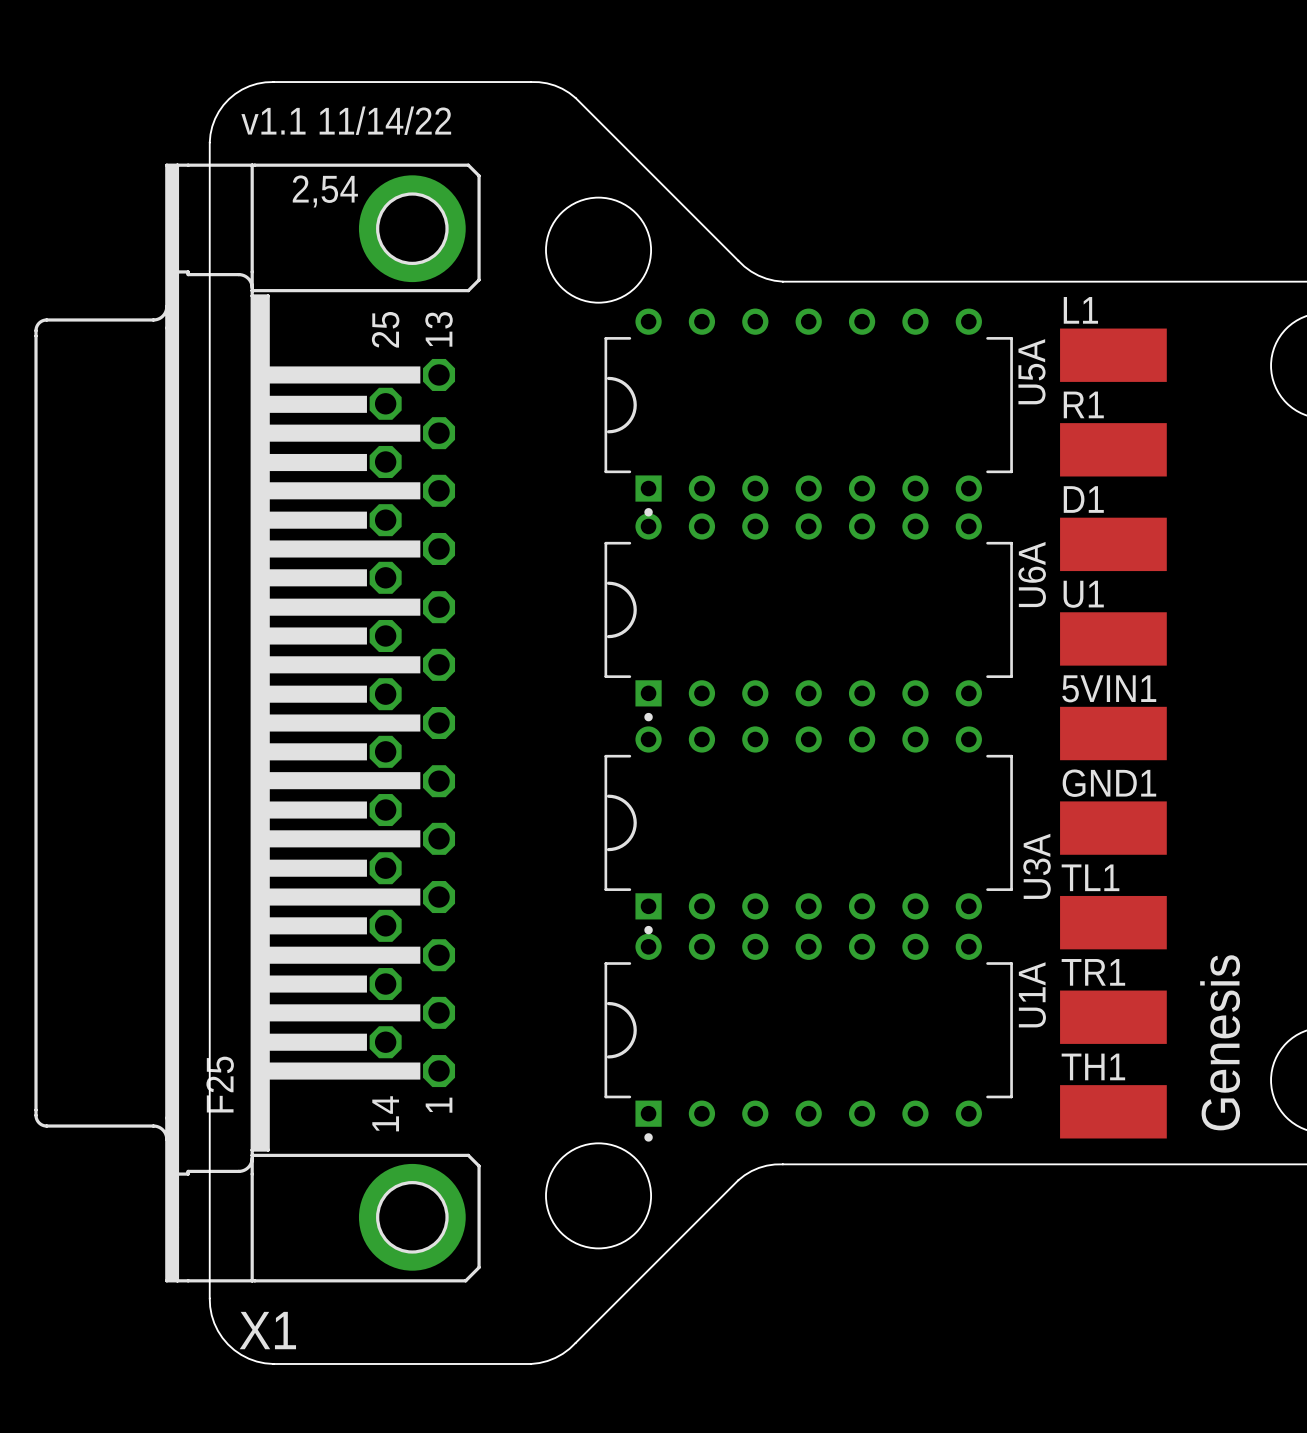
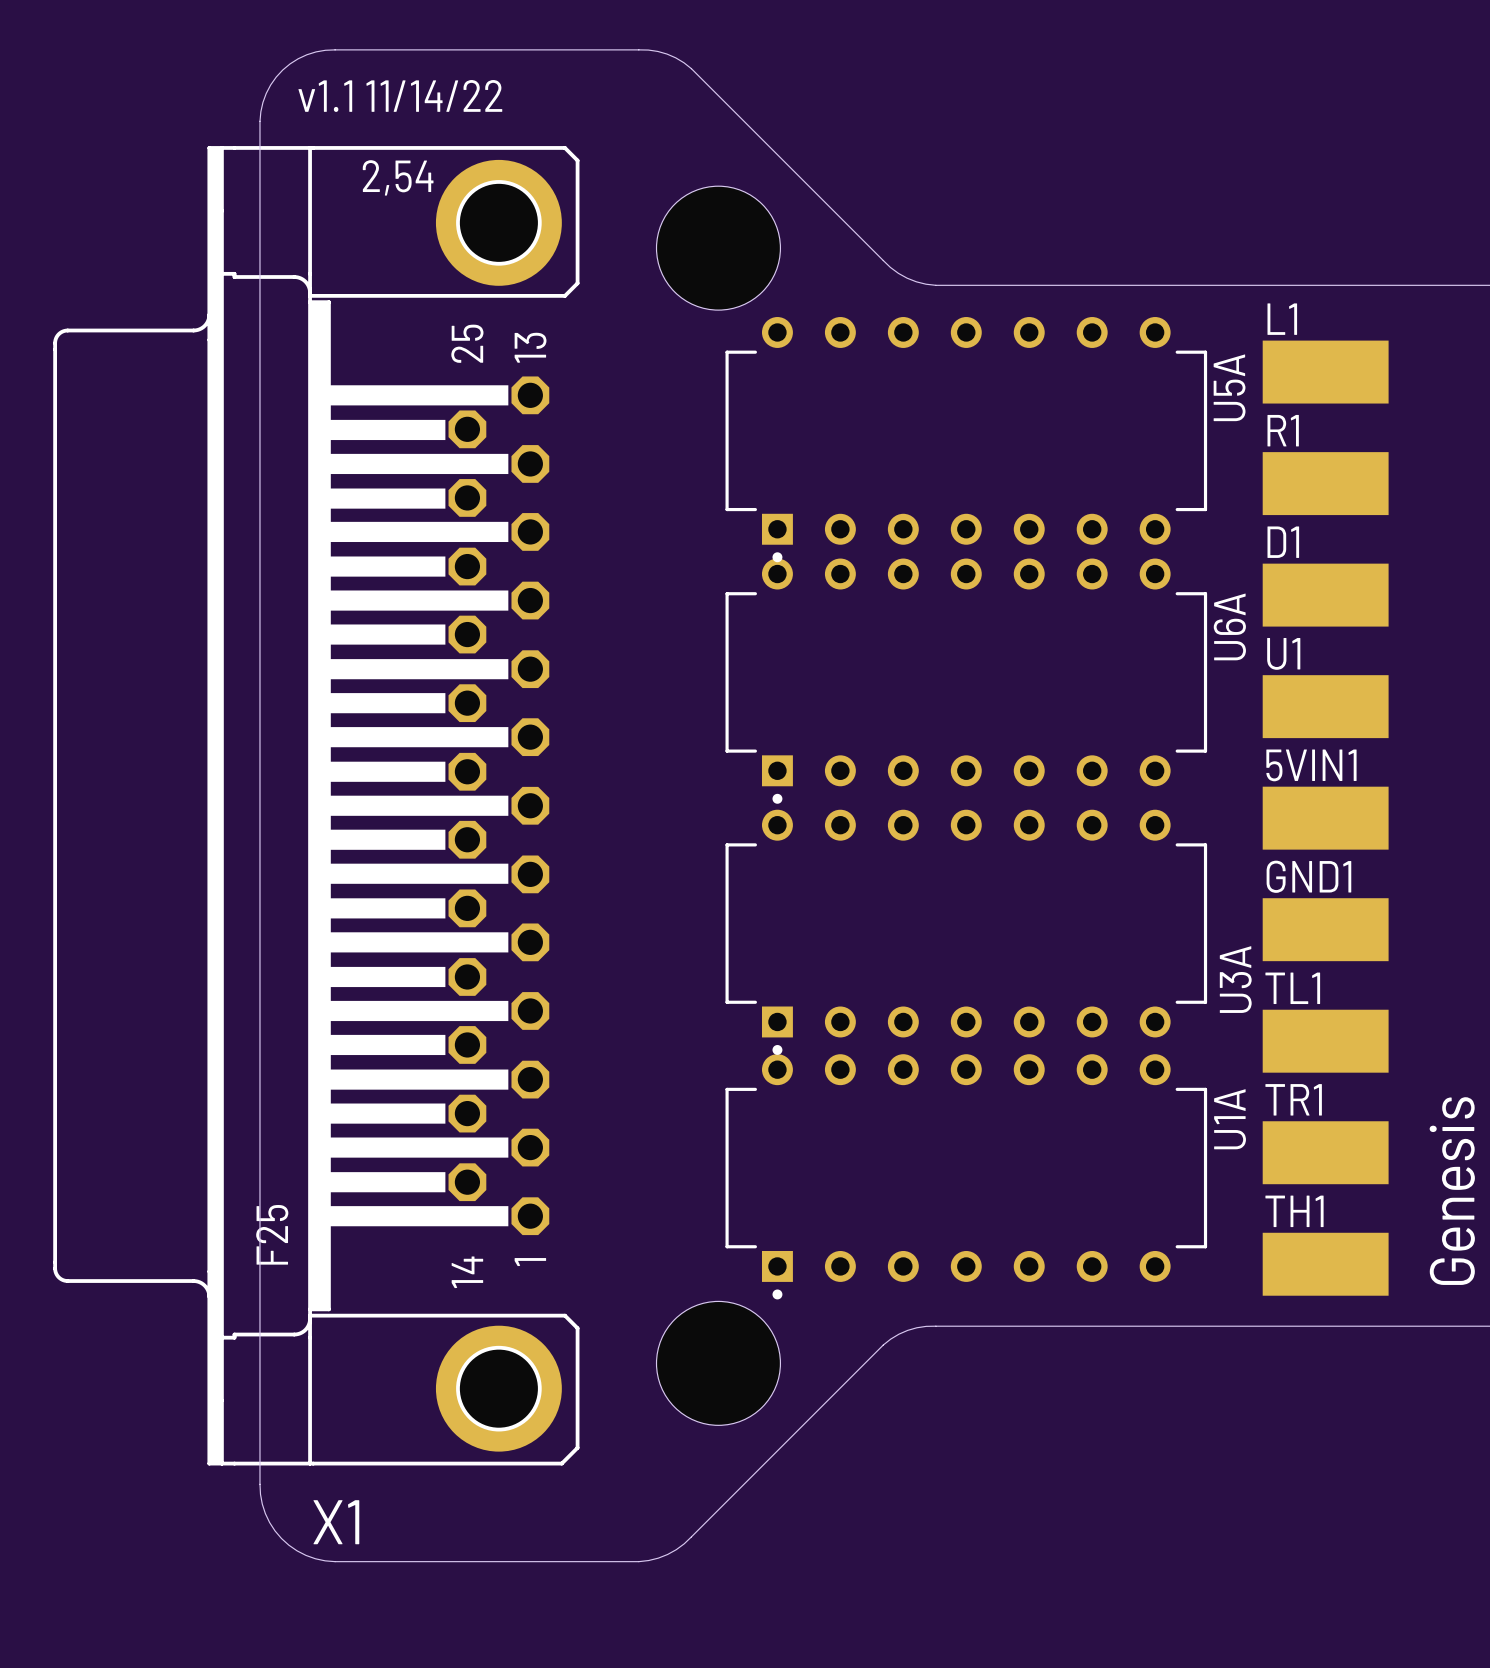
U5A footprint: [604, 308, 1013, 517] -> [725, 317, 1208, 563]
U6A footprint: [604, 513, 1013, 722] -> [725, 558, 1208, 804]
U3A footprint: [604, 726, 1013, 935] -> [725, 809, 1208, 1055]
U1A footprint: [604, 933, 1013, 1142] -> [725, 1054, 1208, 1300]

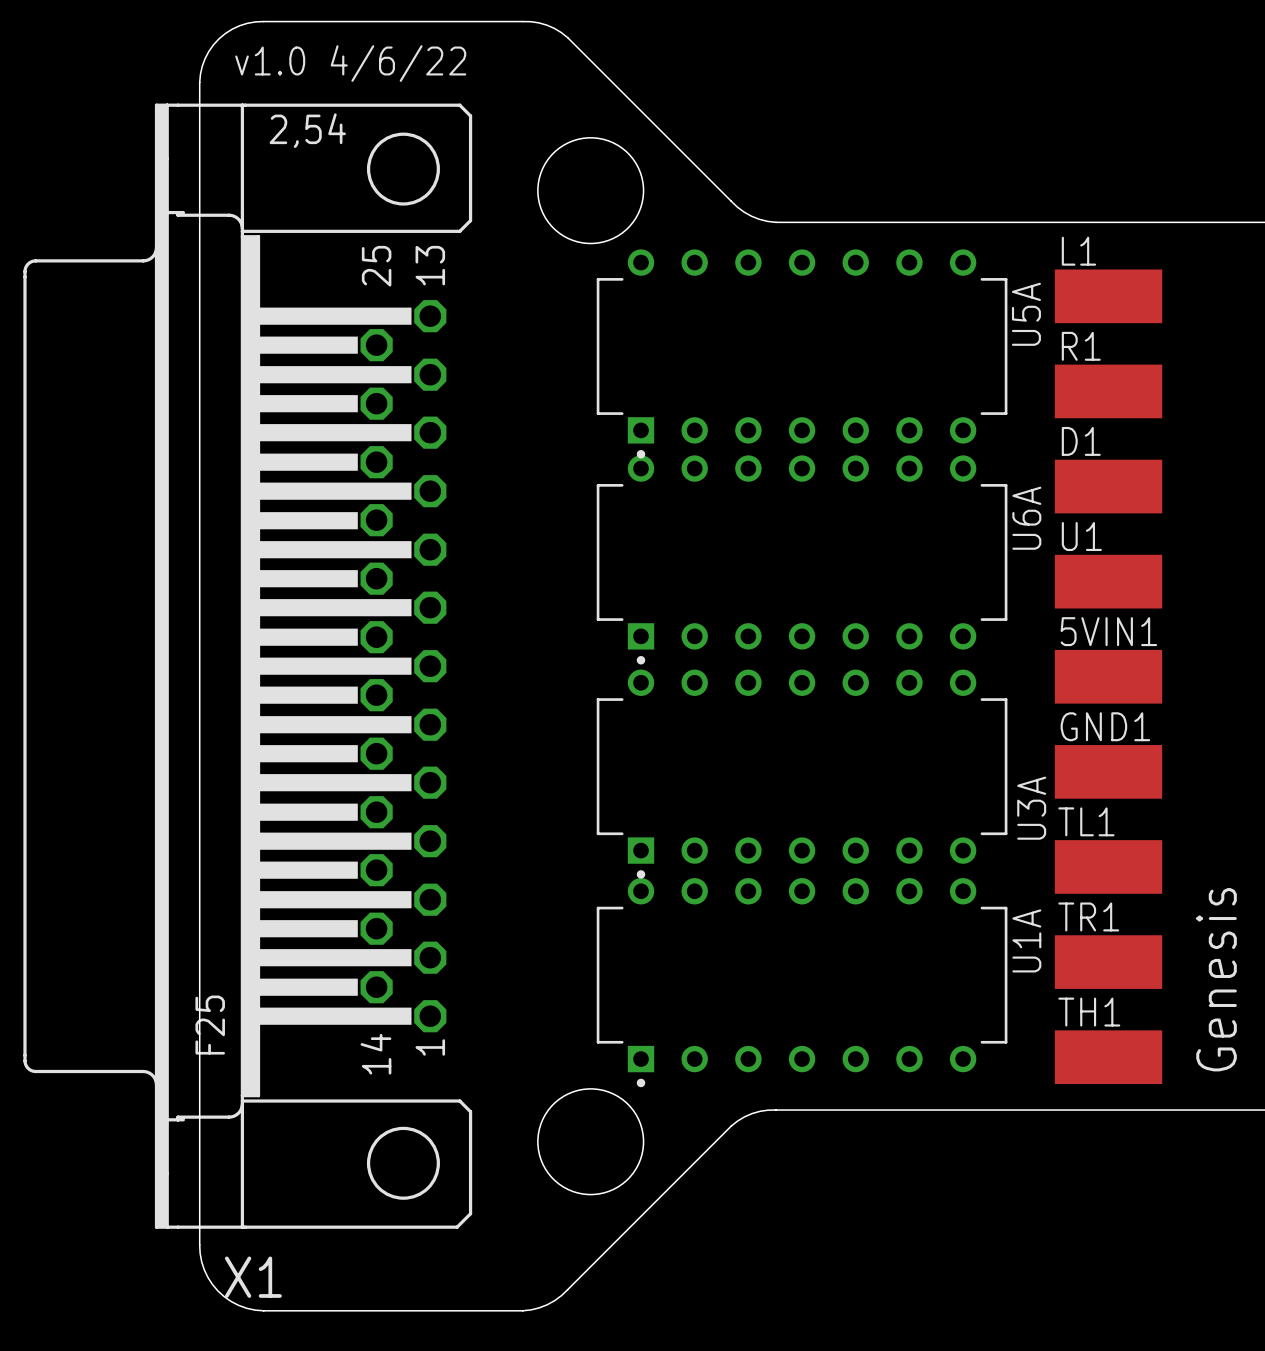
text: v1.1 11/14/22 (400, 95) -> v1.0 4/6/22 (350, 63)
X1 footprint: [53, 146, 580, 1466] -> [23, 103, 473, 1229]

